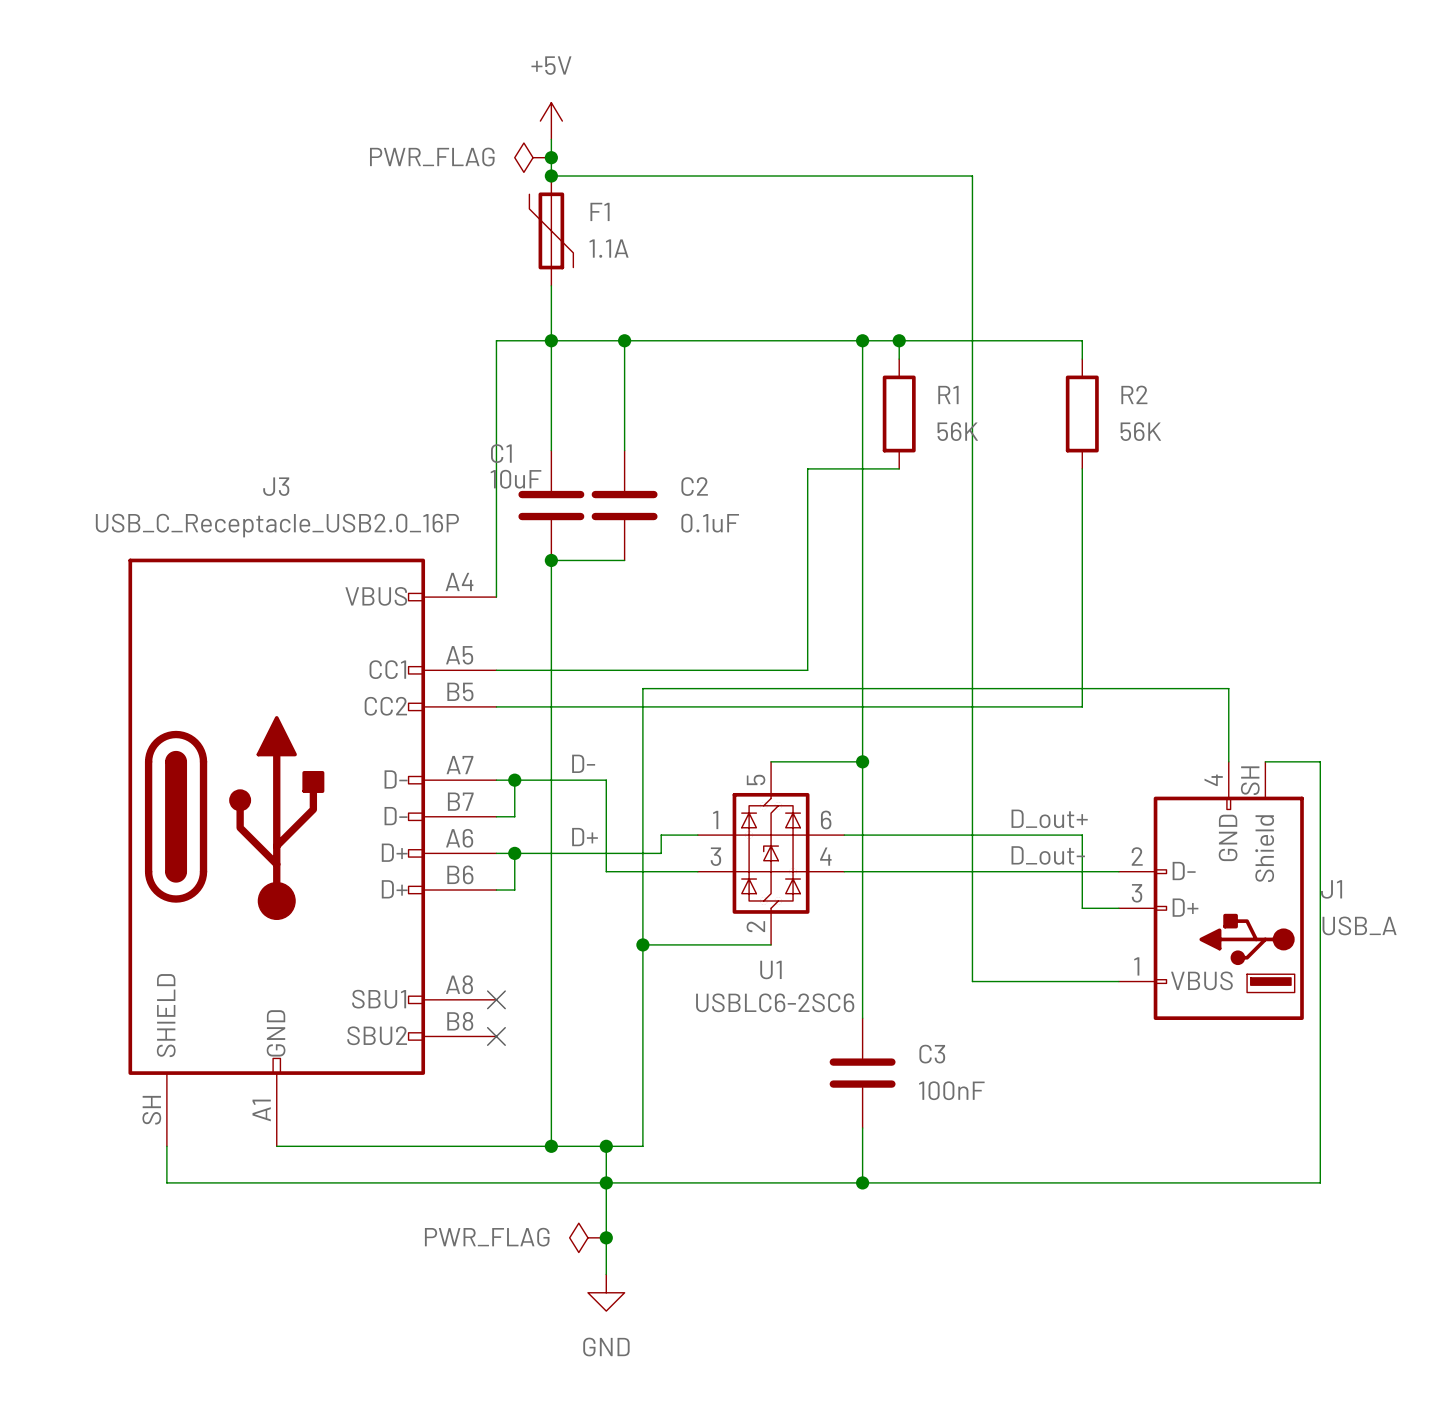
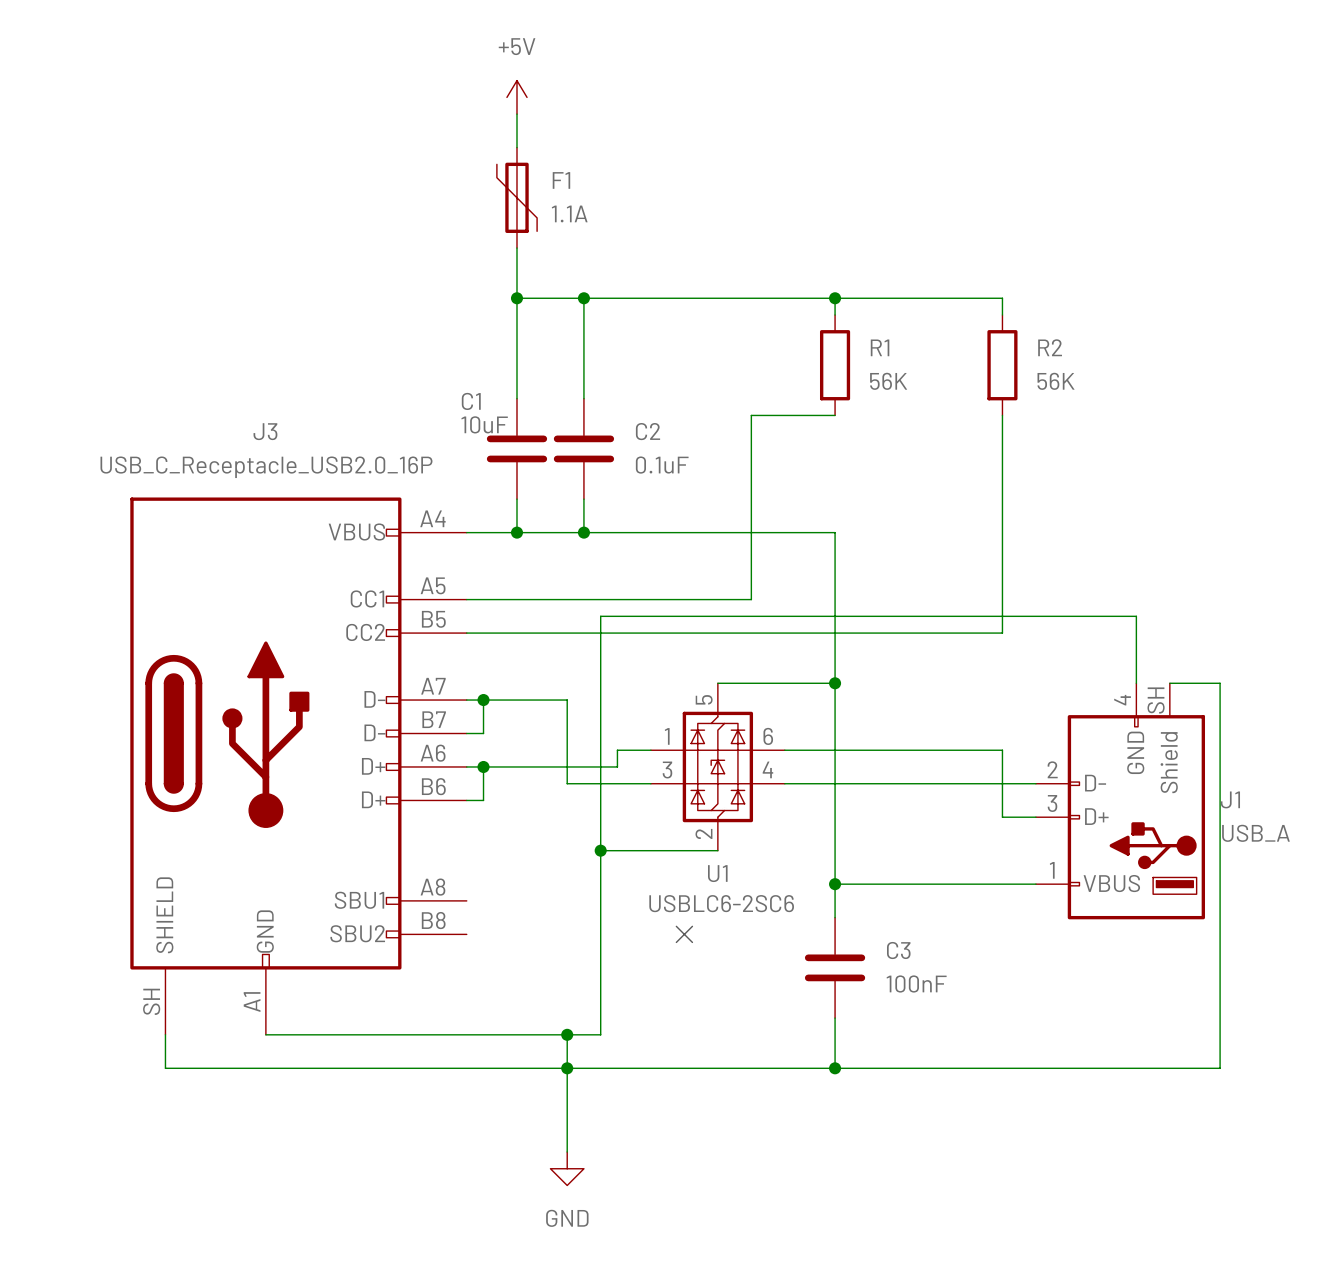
power symbol: PWR_FLAG (533, 157) -> none
junction: (551, 157) -> none
wire: (551, 176) (972, 176) (972, 981) -> (835, 884) (902, 884)
junction: (551, 176) -> none
wire: (551, 340) (496, 340) (496, 597) -> (835, 917) (835, 532) (466, 532)
wire: (862, 340) (862, 1018) -> none
junction: (862, 340) -> none
wire: (551, 560) (624, 560) -> (583, 532) (583, 499)
junction position: (551, 560) -> (516, 532)
wire: (551, 597) (551, 1146) -> none
junction: none -> (583, 532)
wire: none -> (801, 683) (835, 683)
junction position: (862, 761) -> (835, 683)
label: D- (583, 763) -> none
label: D_out+ (1049, 818) -> none
label: D+ (585, 837) -> none
label: D_out- (1048, 855) -> none
junction: none -> (835, 884)
no-connect mark: (496, 999) -> none
no-connect mark: (496, 1036) -> none
no-connect mark: none -> (684, 934)
C3 position: (862, 1073) -> (835, 967)
wire: (862, 1128) (862, 1182) -> (835, 1018) (835, 1068)
junction: (551, 1146) -> none
junction position: (862, 1182) -> (835, 1068)
power symbol: PWR_FLAG (587, 1237) -> none
junction: (606, 1237) -> none

